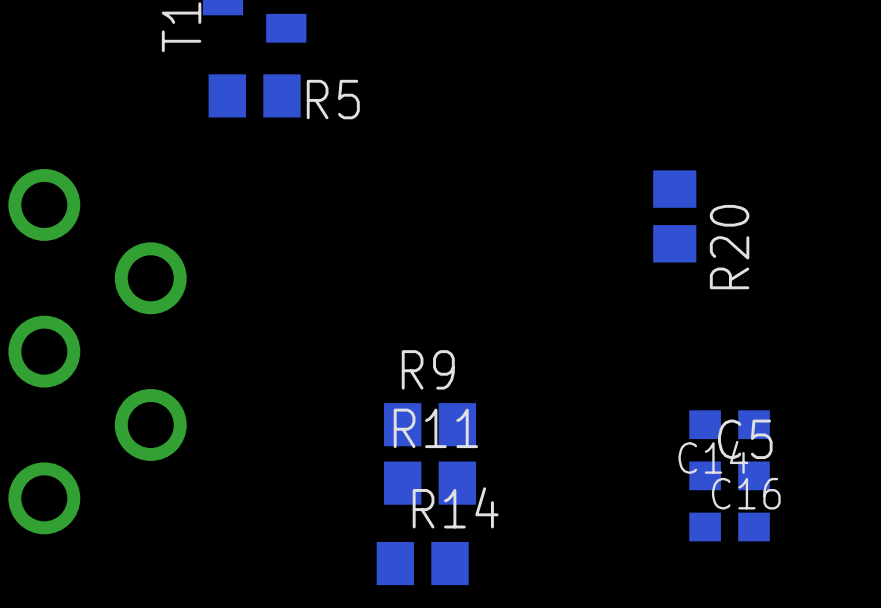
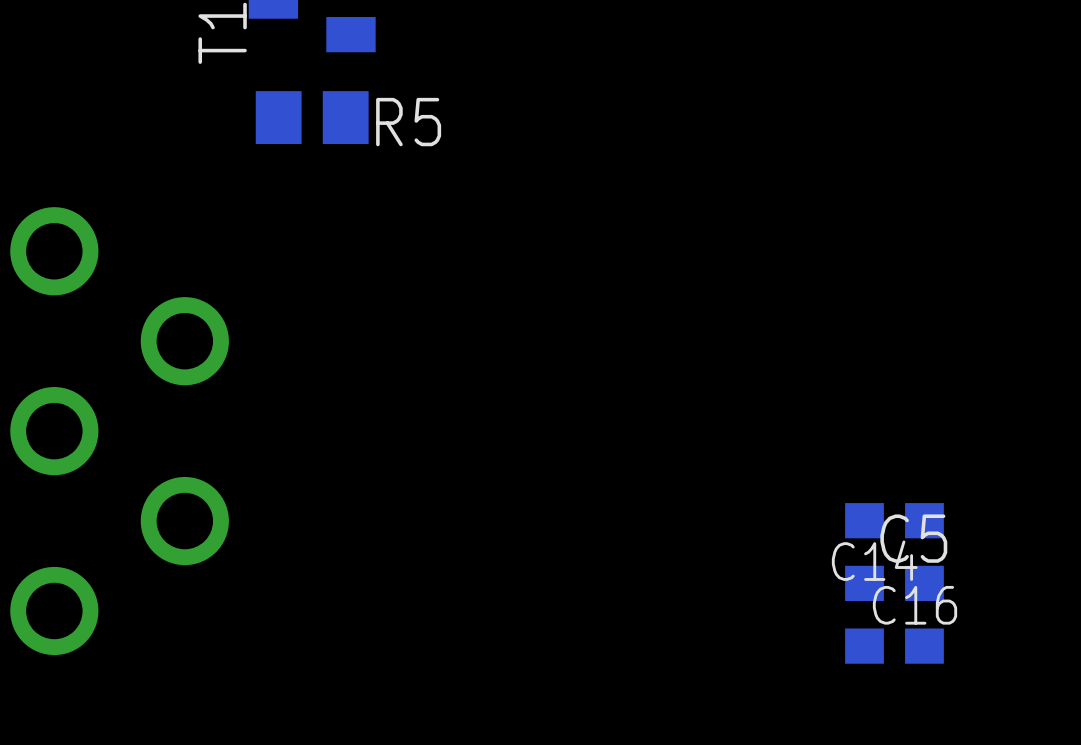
R20: (674, 216) -> none
R9: (429, 424) -> none
R11: (429, 483) -> none
R14: (422, 563) -> none

